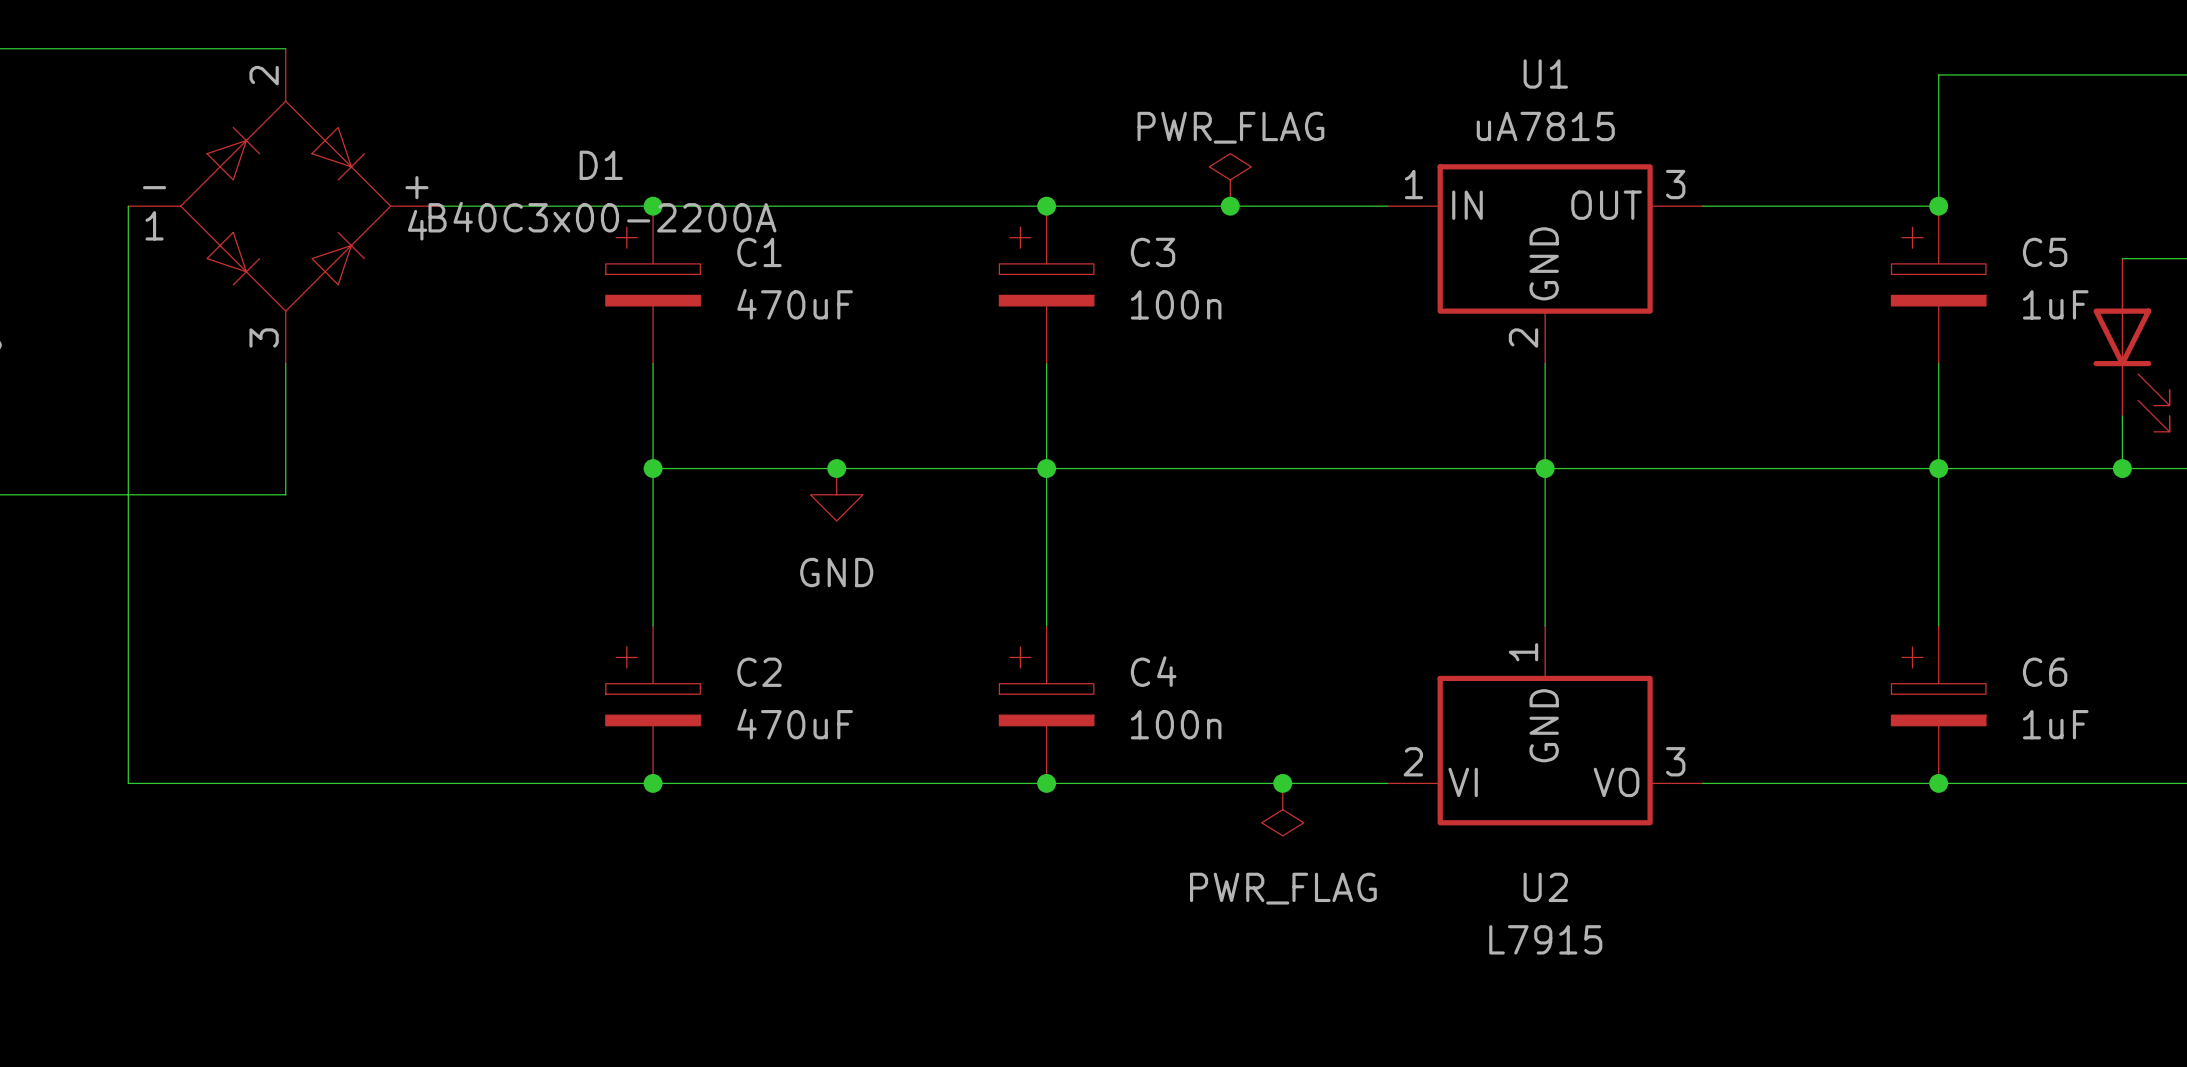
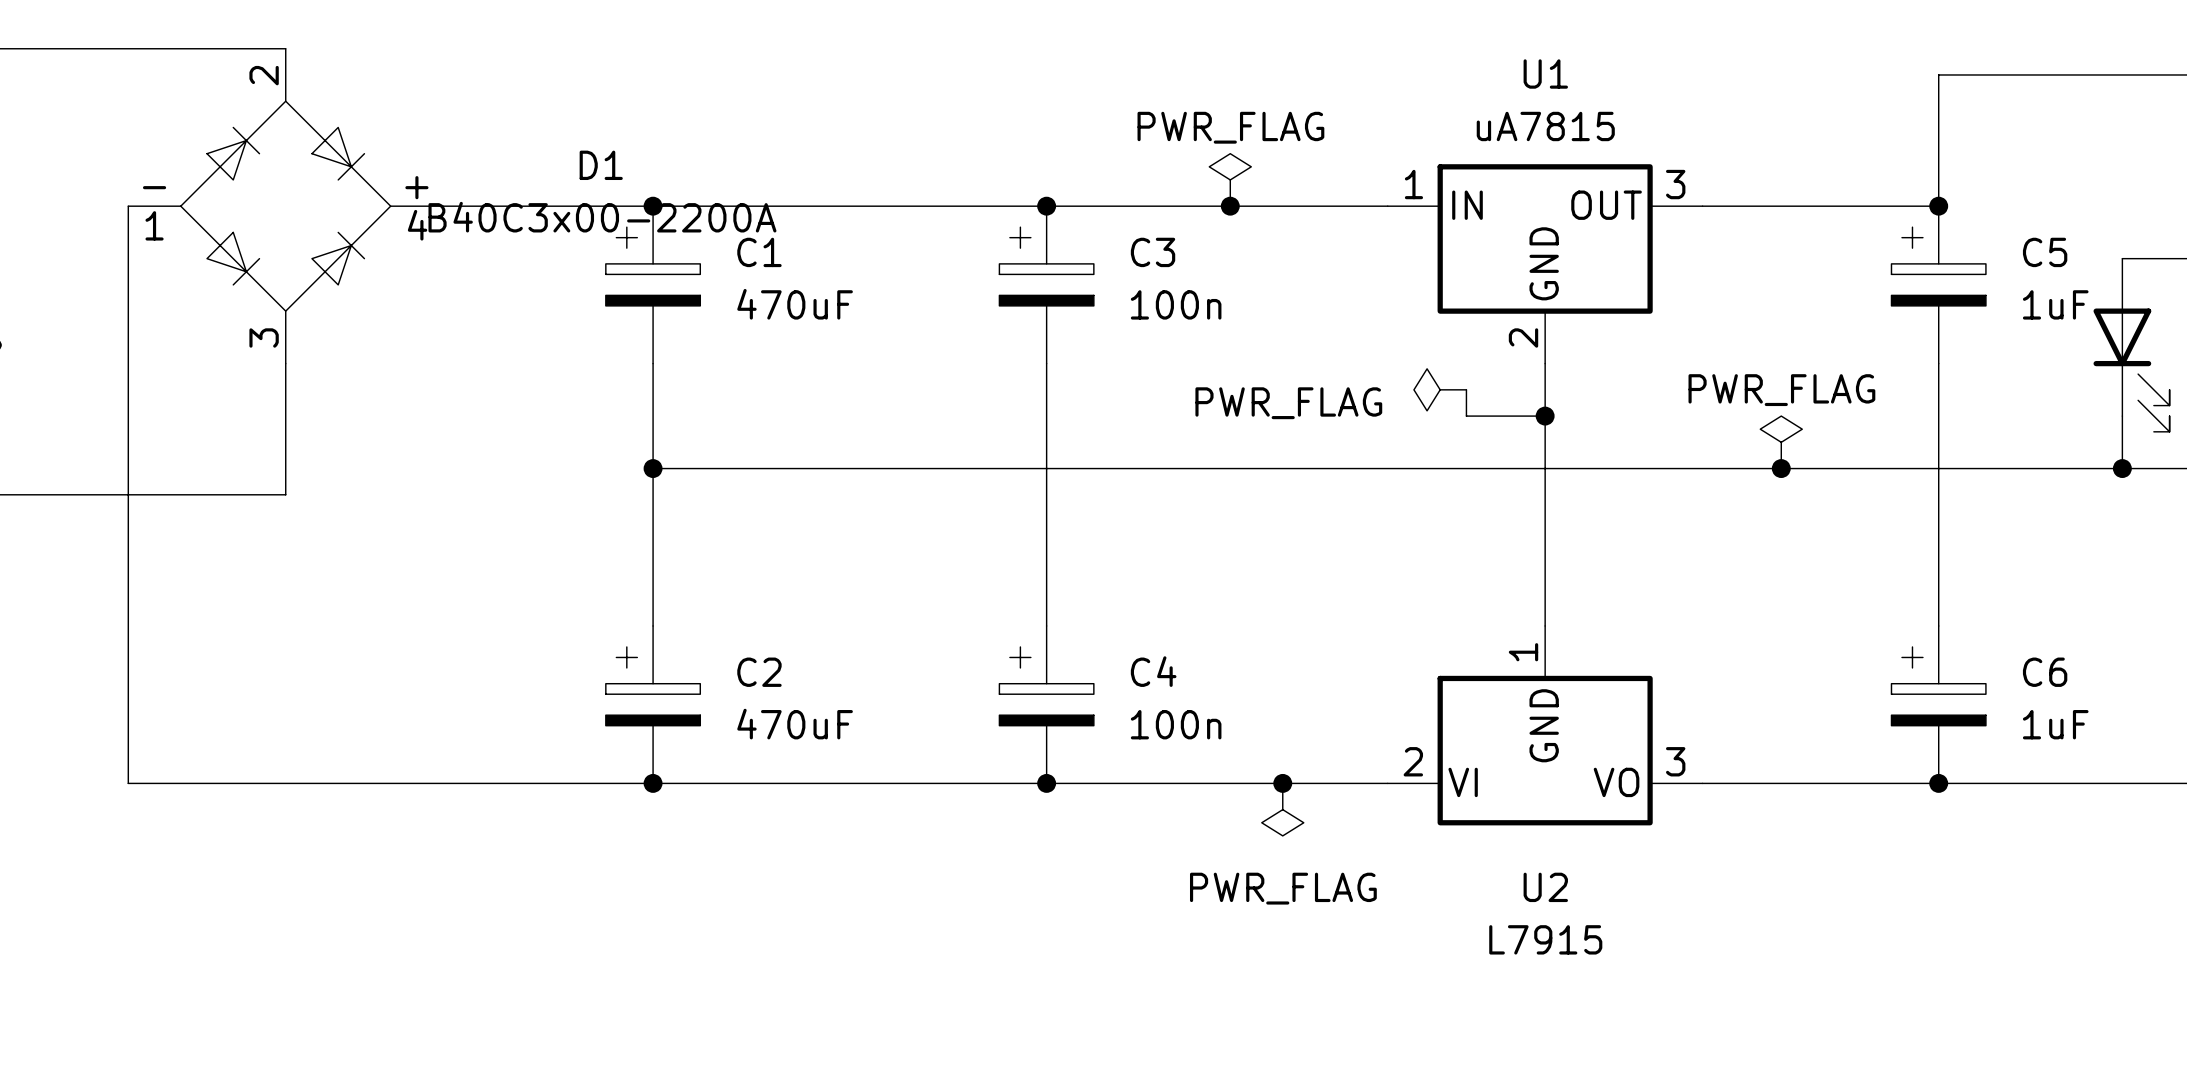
power symbol: none -> PWR_FLAG (1440, 389)
wire: none -> (1466, 389) (1466, 416) (1545, 416)
power symbol: none -> PWR_FLAG (1781, 442)
junction: (836, 468) -> none
junction: (1046, 468) -> none
junction position: (1545, 468) -> (1545, 416)
junction: none -> (1781, 468)
junction: (1938, 468) -> none
power symbol: GND (836, 494) -> none

